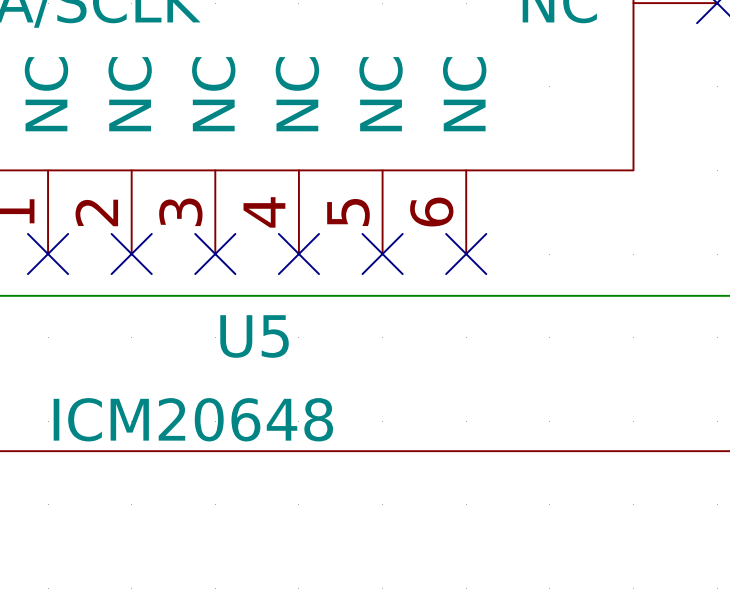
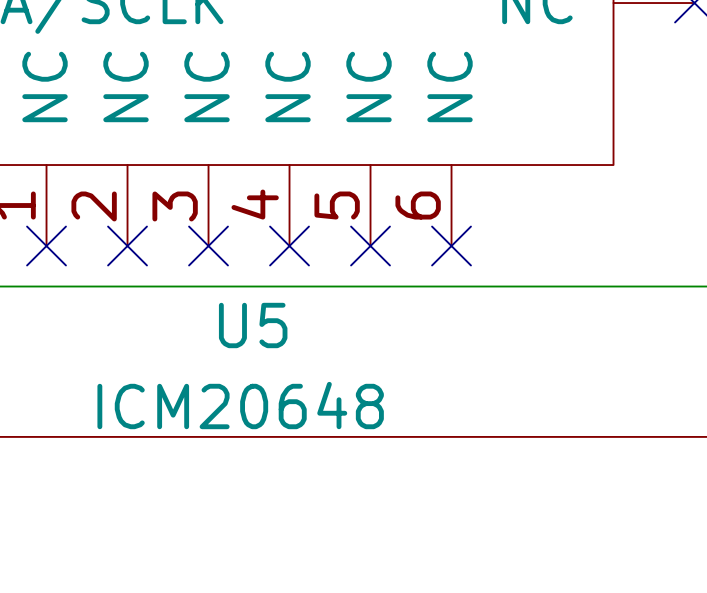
U5 value position: ICM20648 (193, 419) -> ICM20648 (240, 405)

